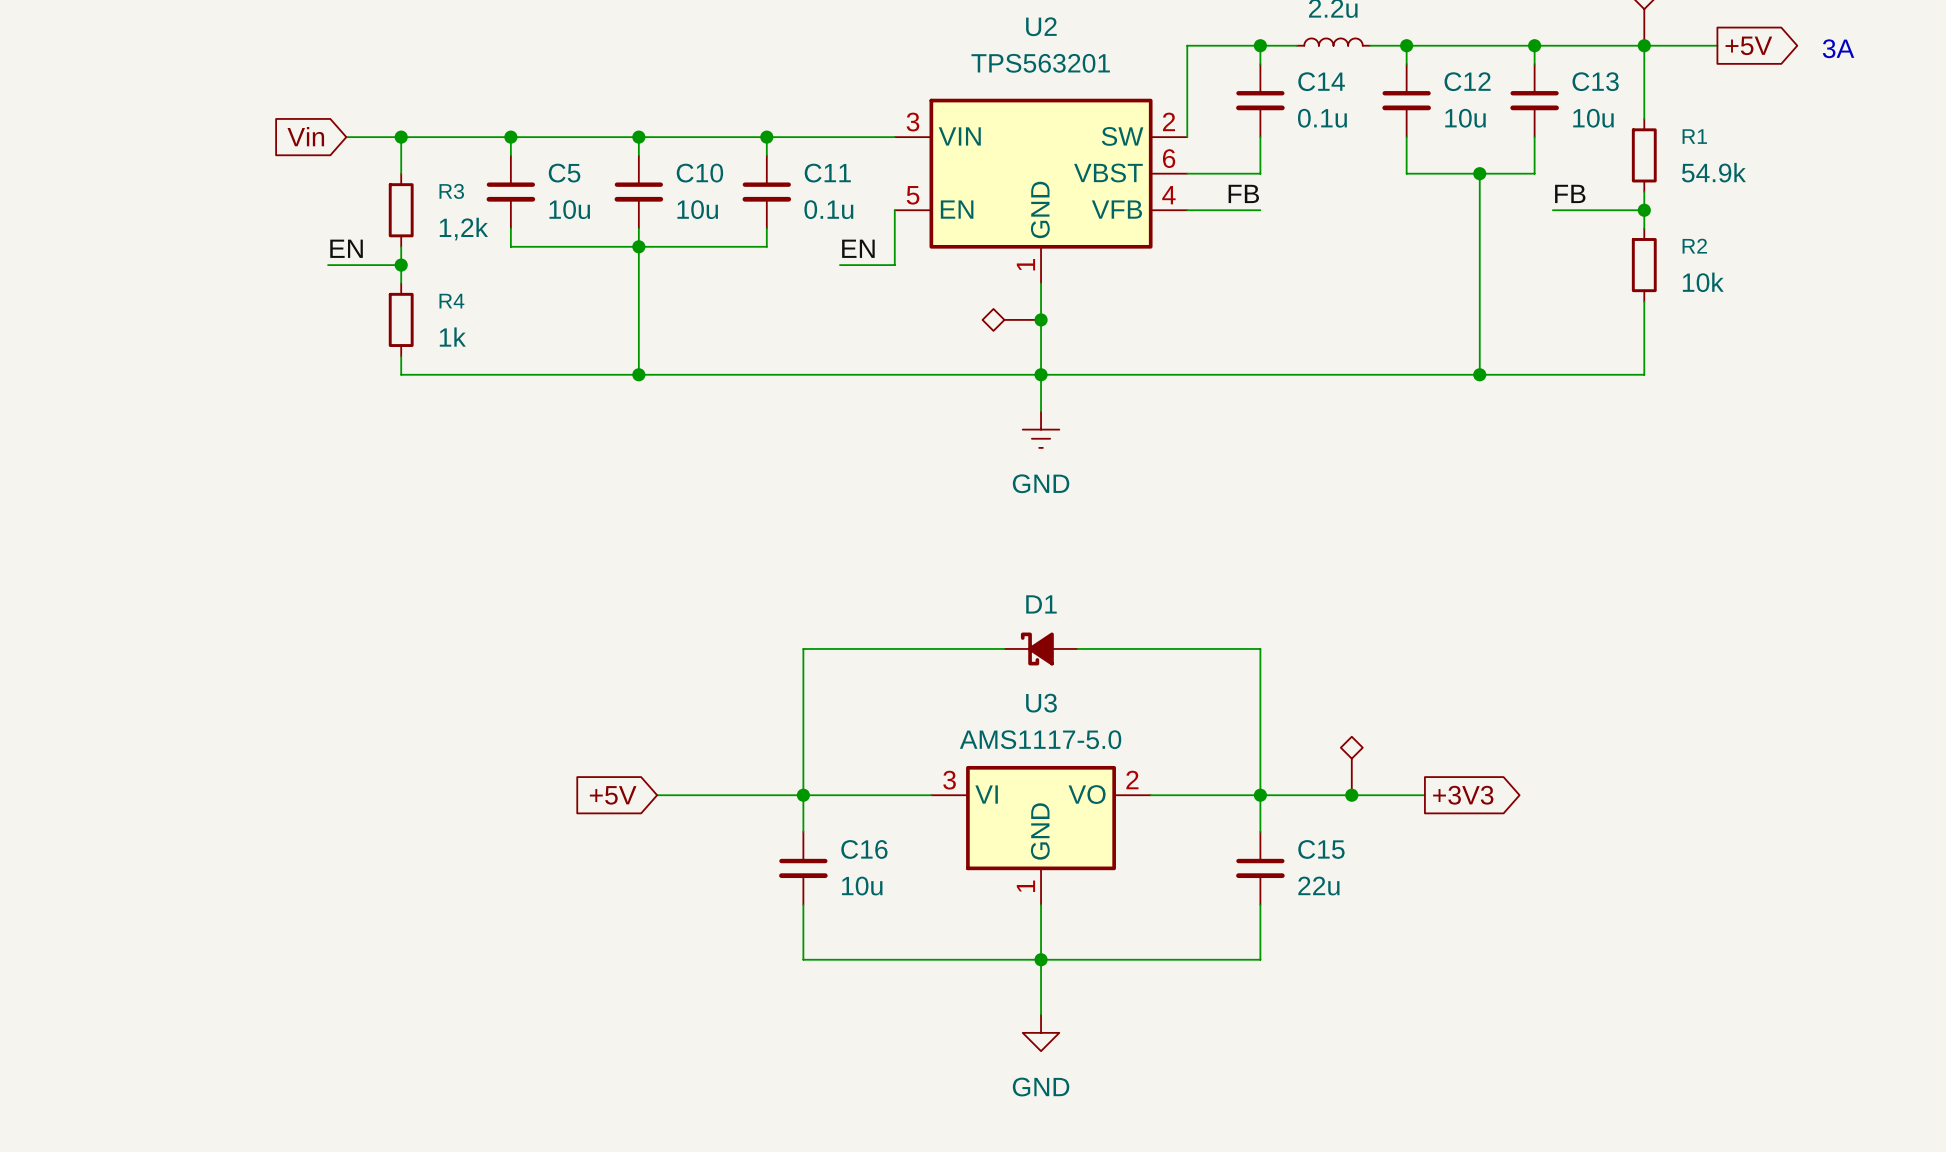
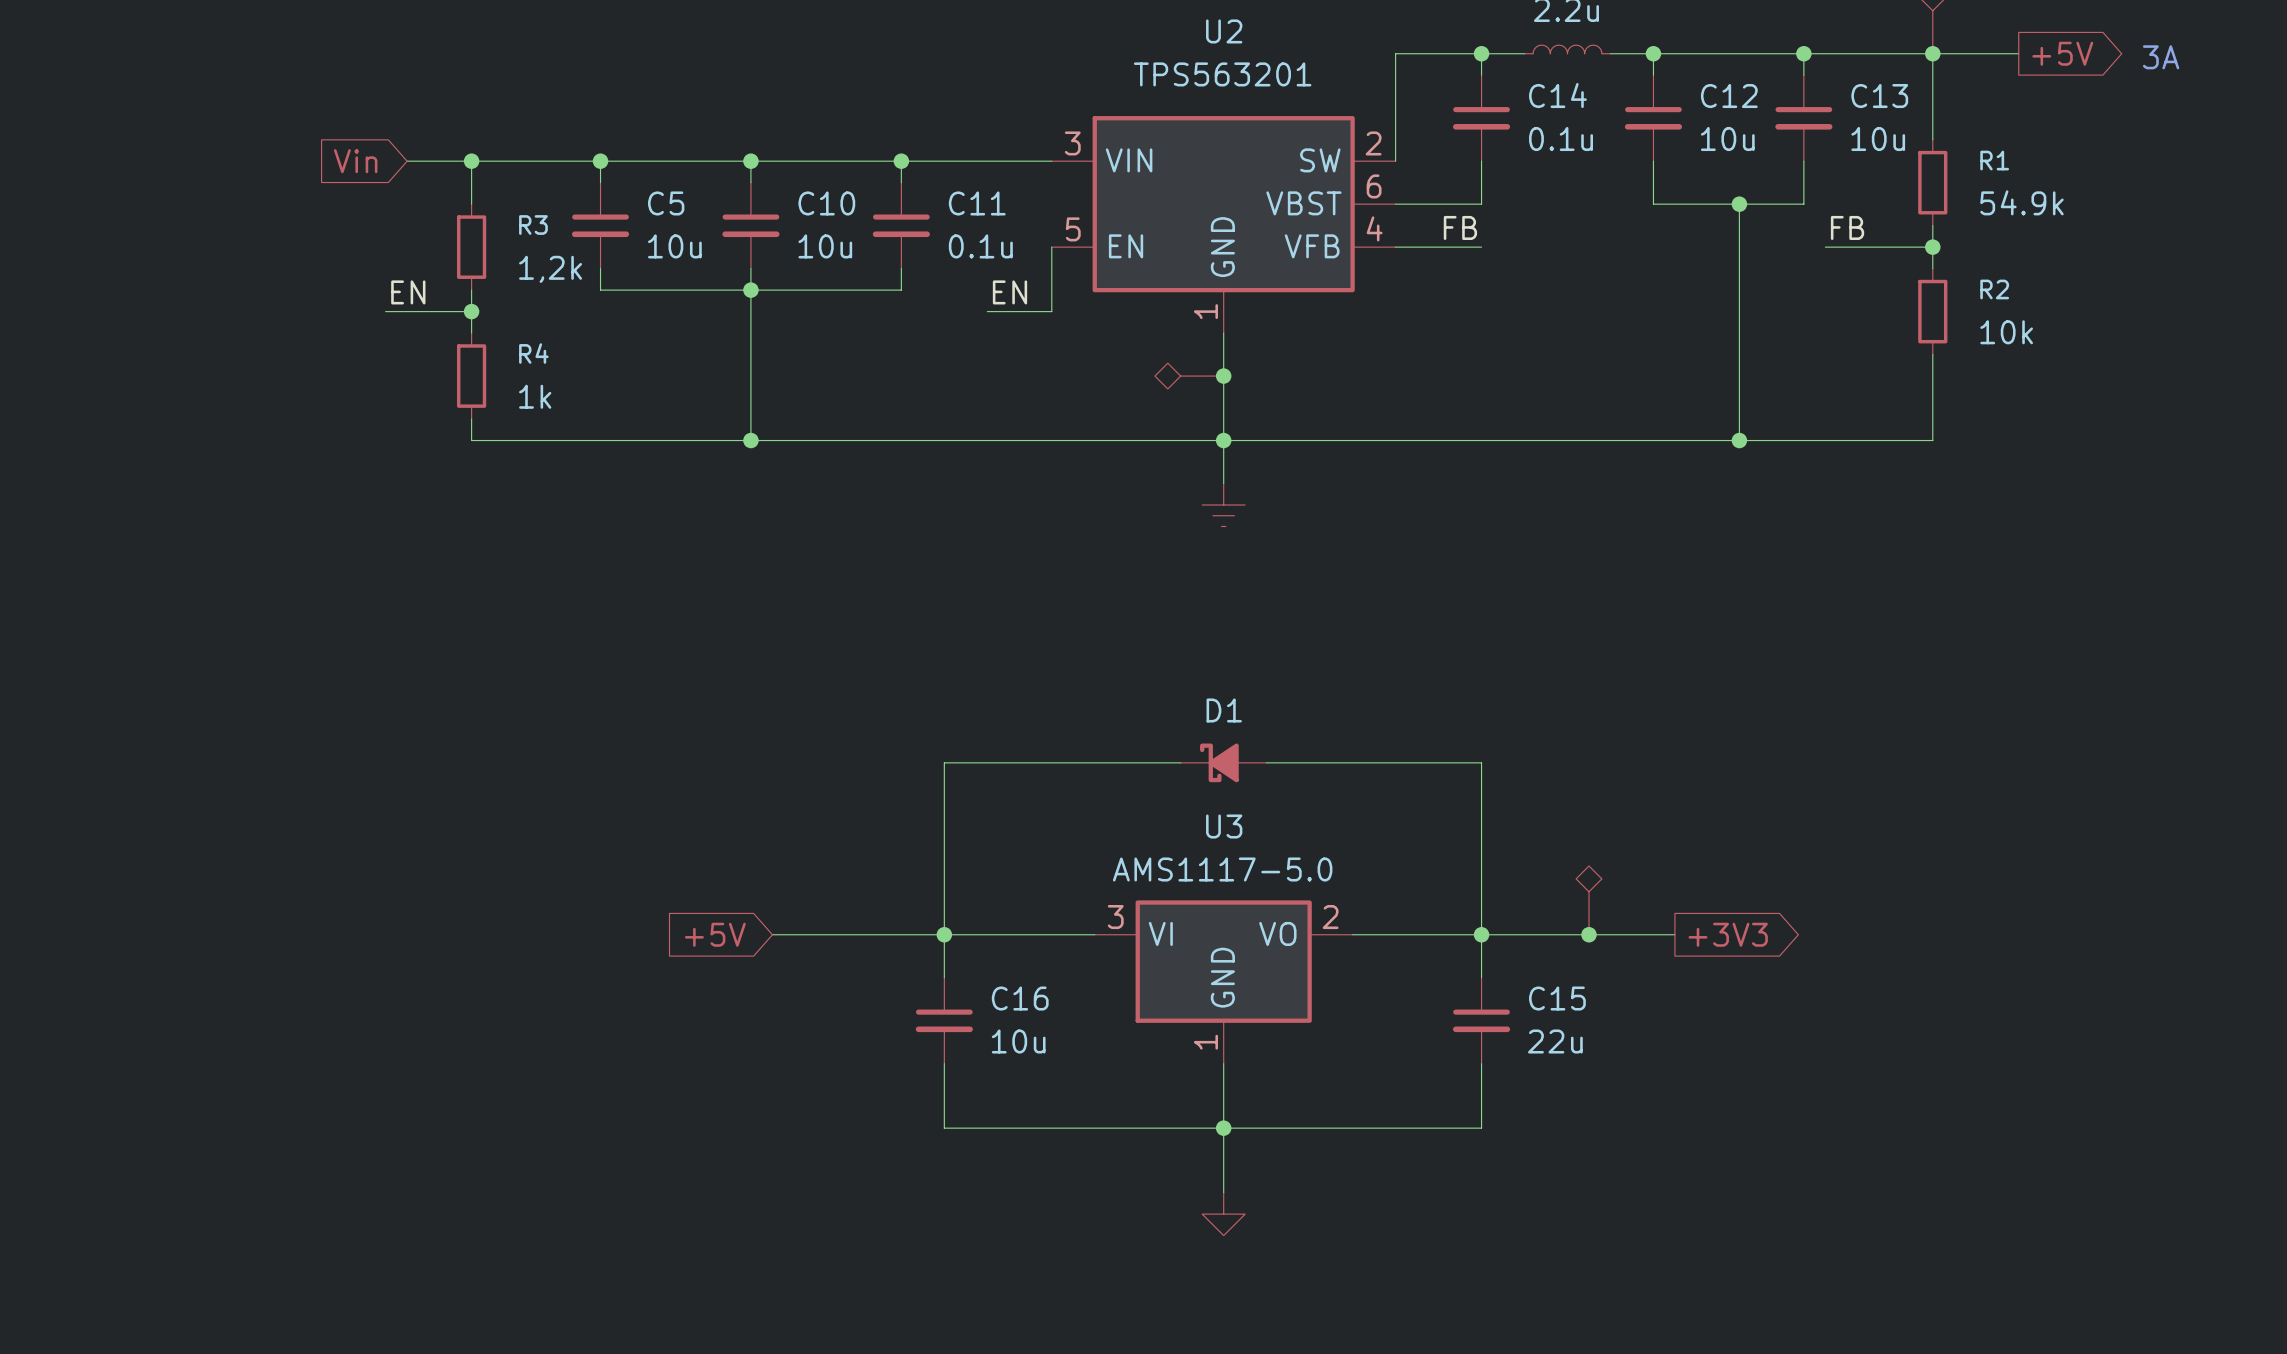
power symbol text: GND (1041, 483) -> none
power symbol text: GND (1041, 1087) -> none

